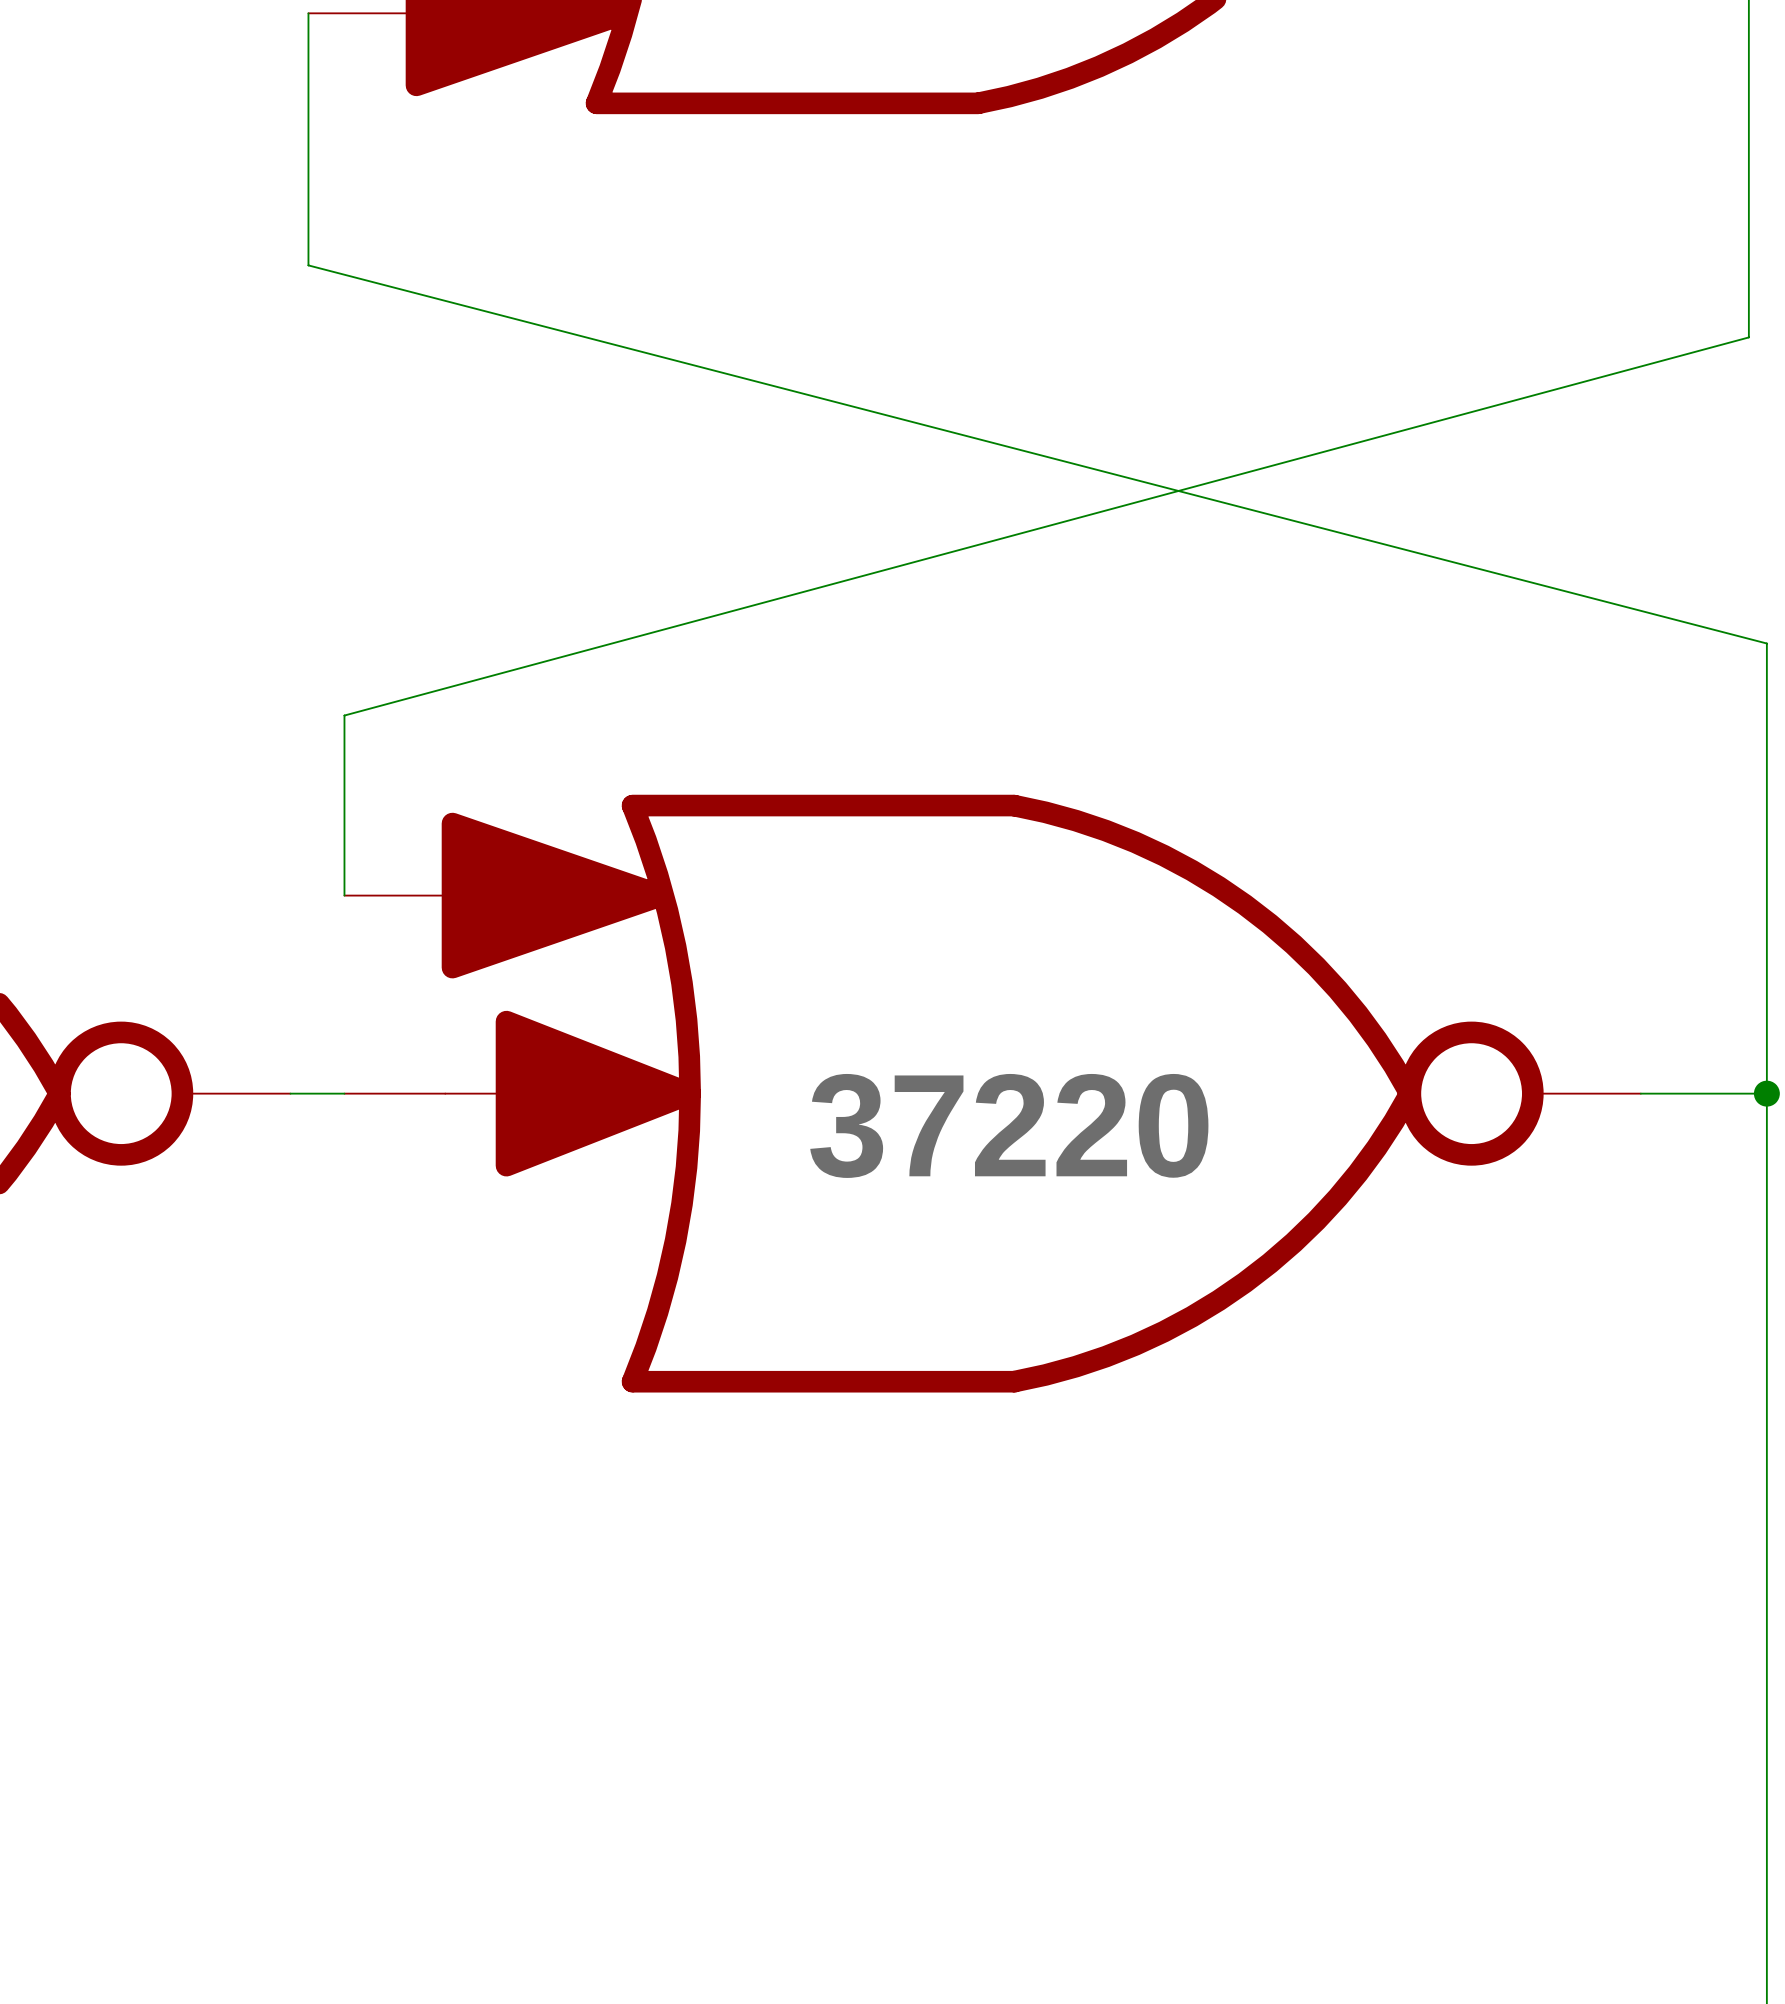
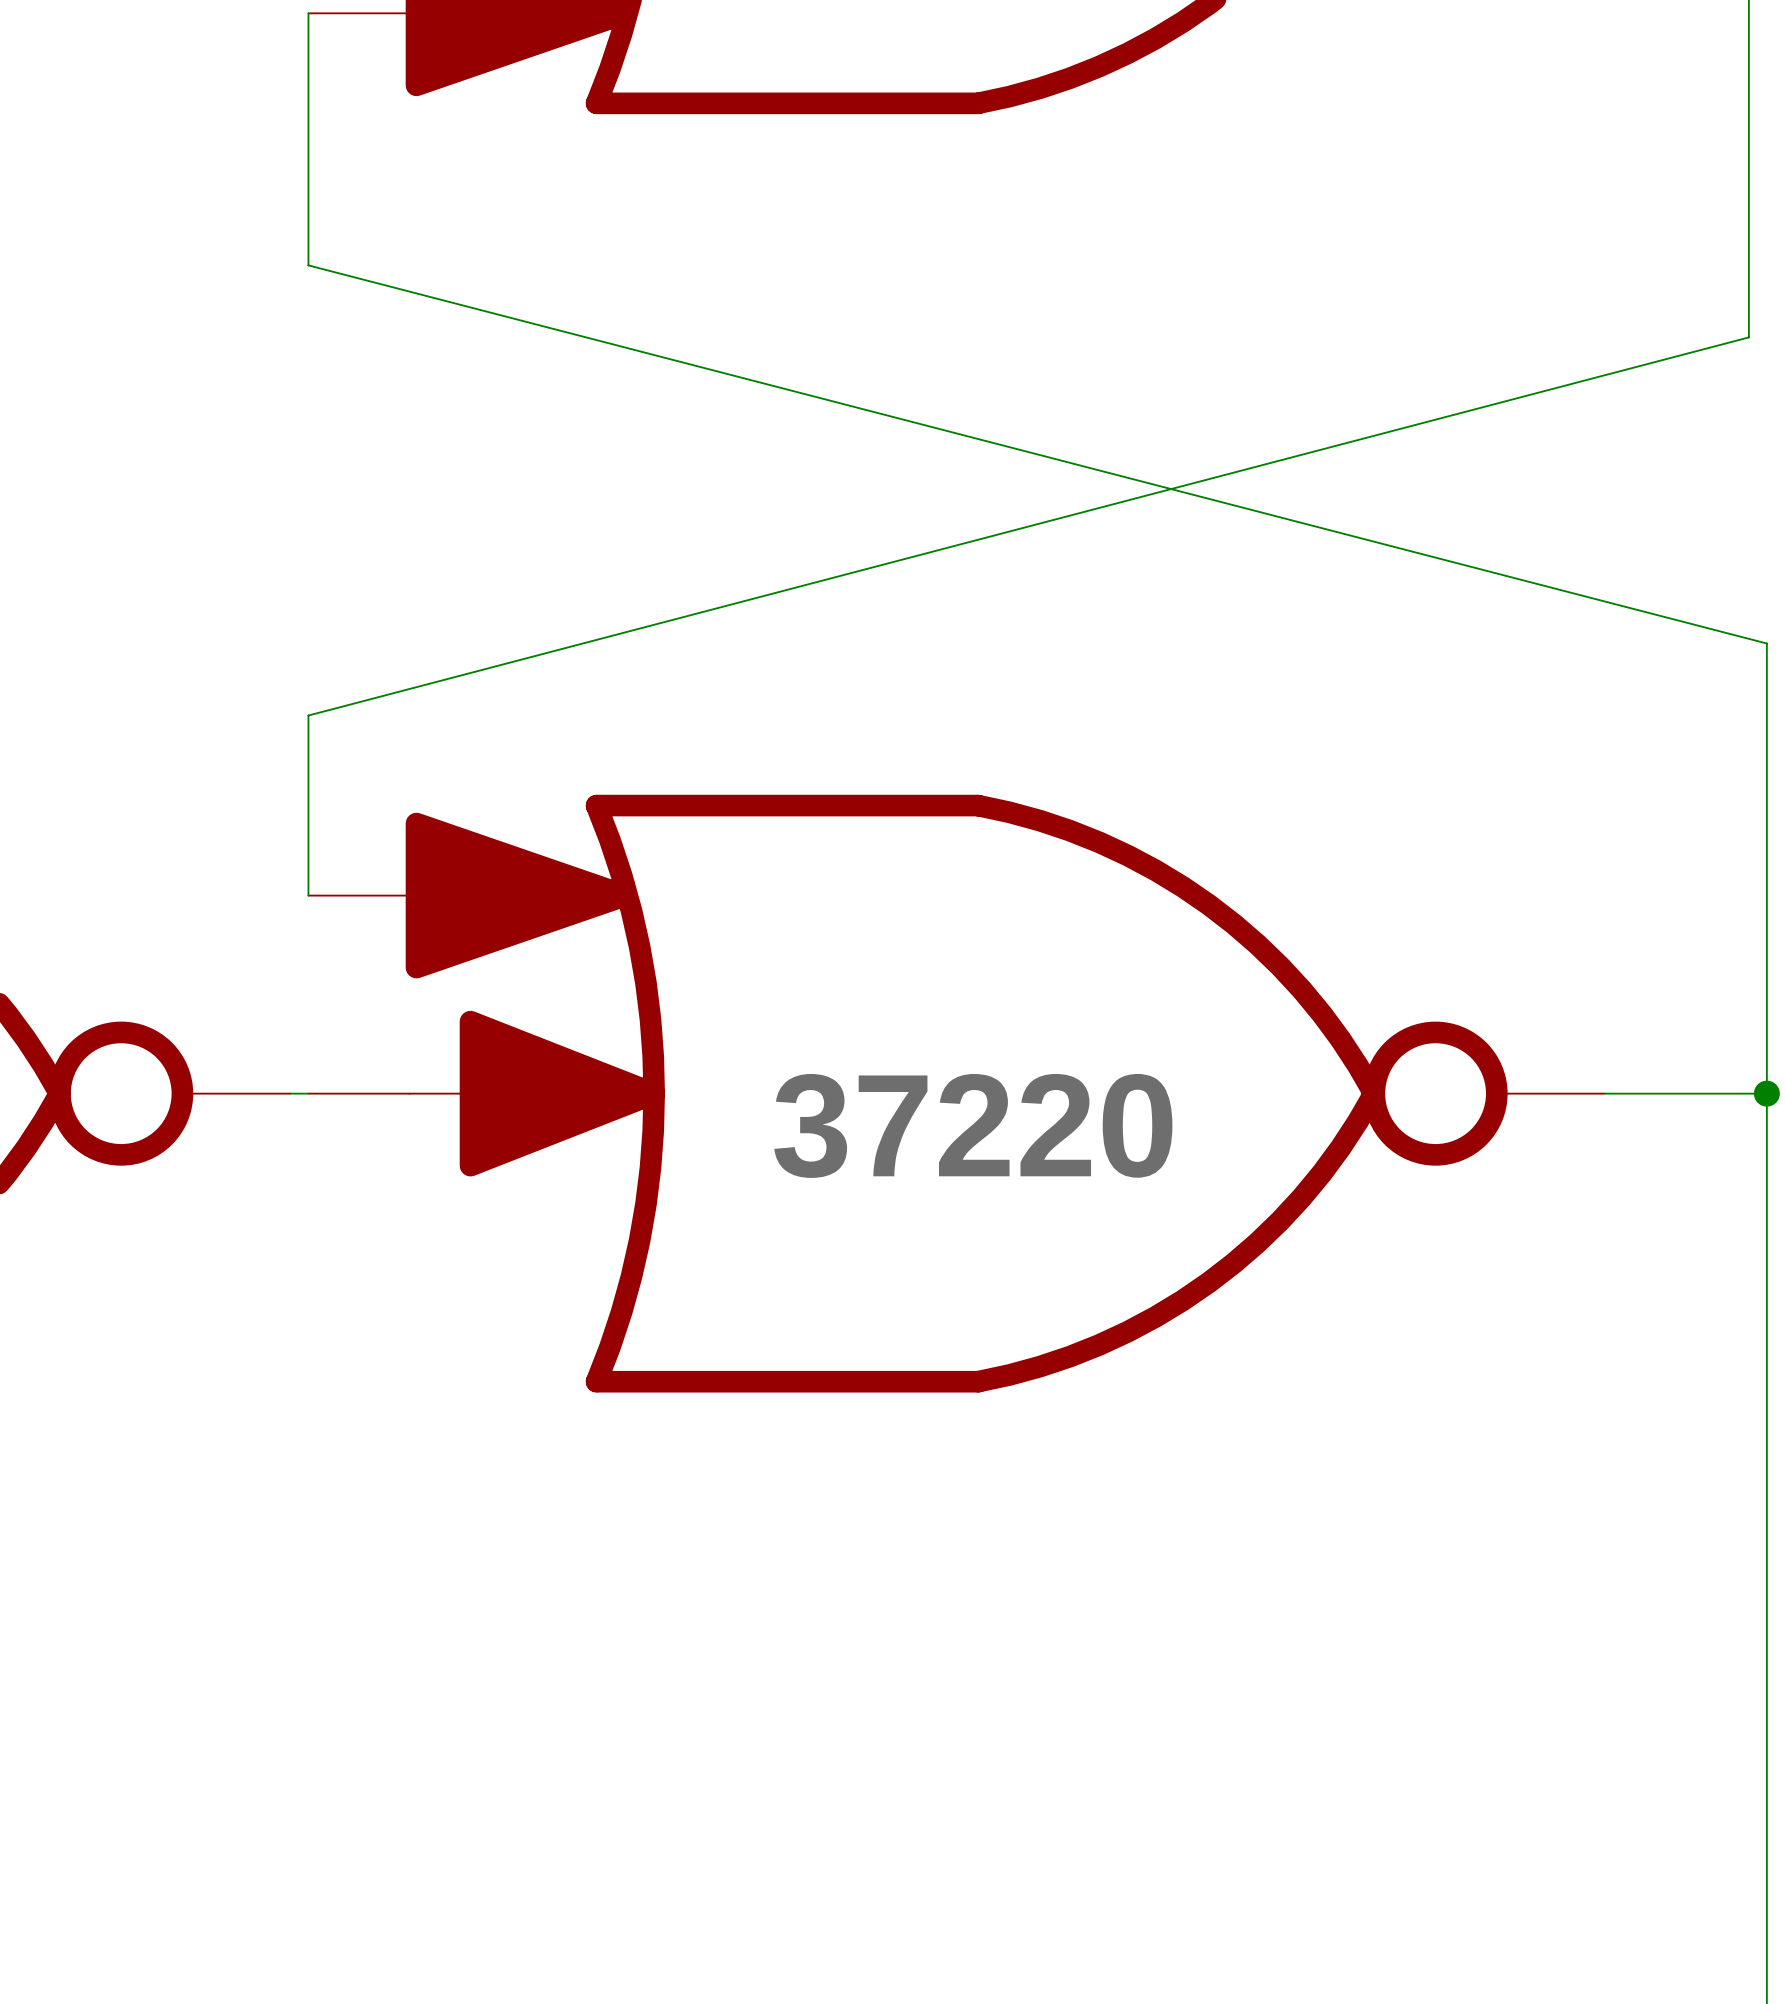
wire: (1748, 337) (344, 715) (344, 895) -> (1748, 337) (308, 715) (308, 895)
part position: (992, 1093) -> (956, 1093)

